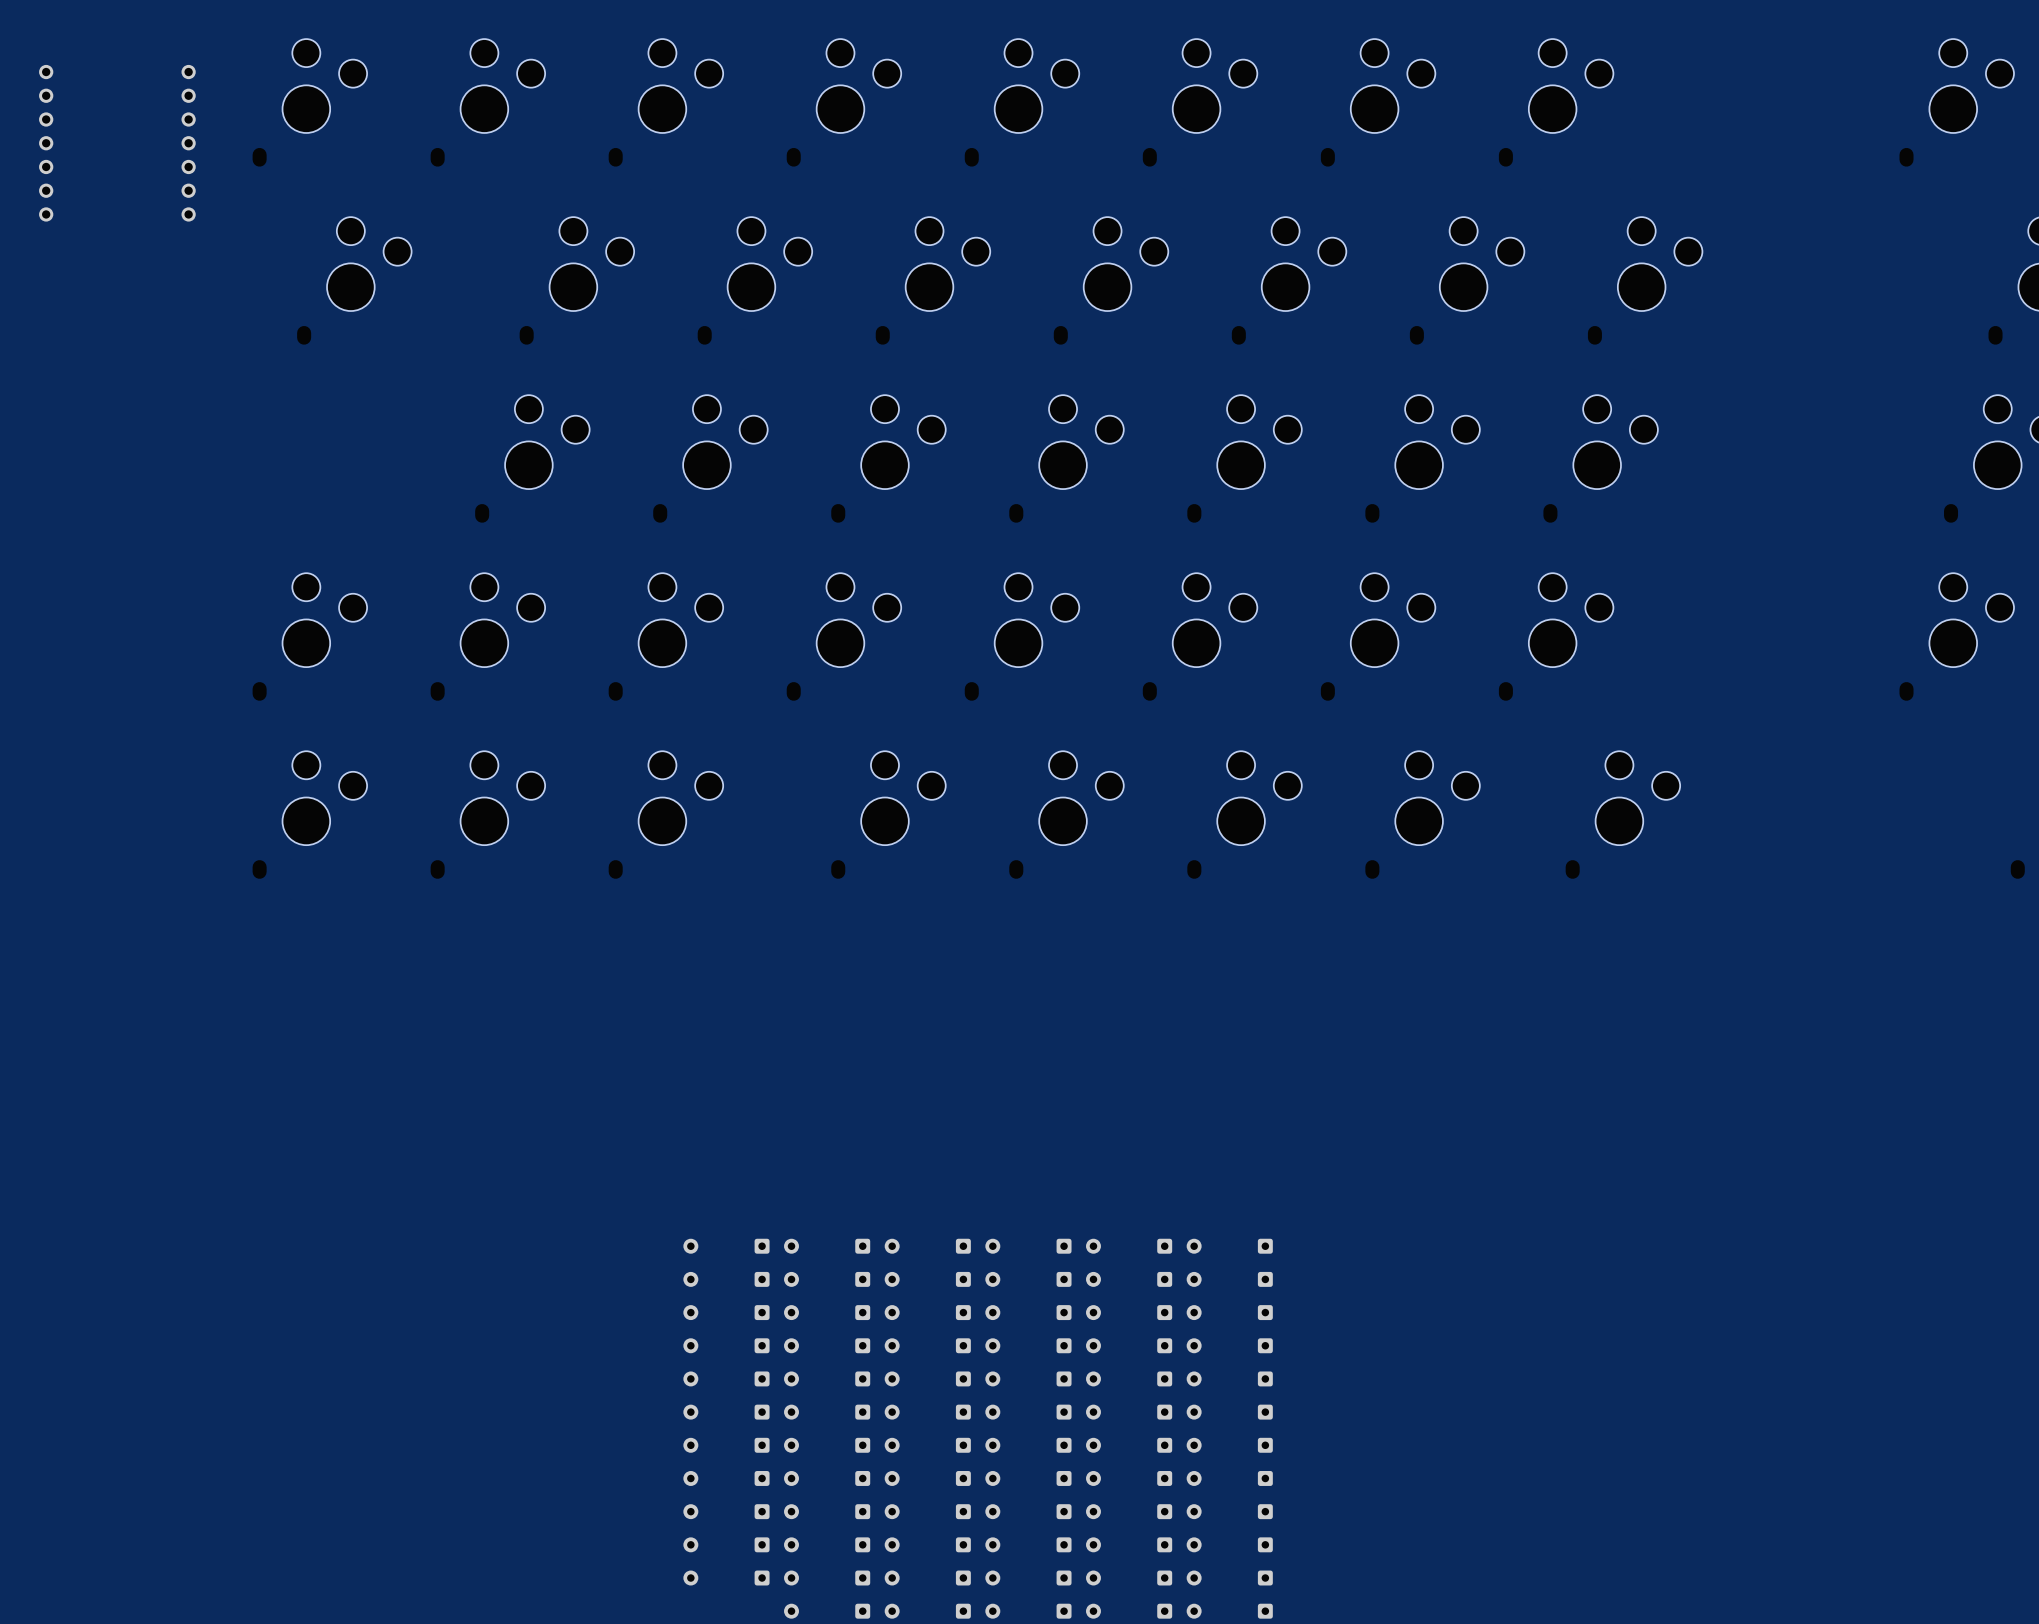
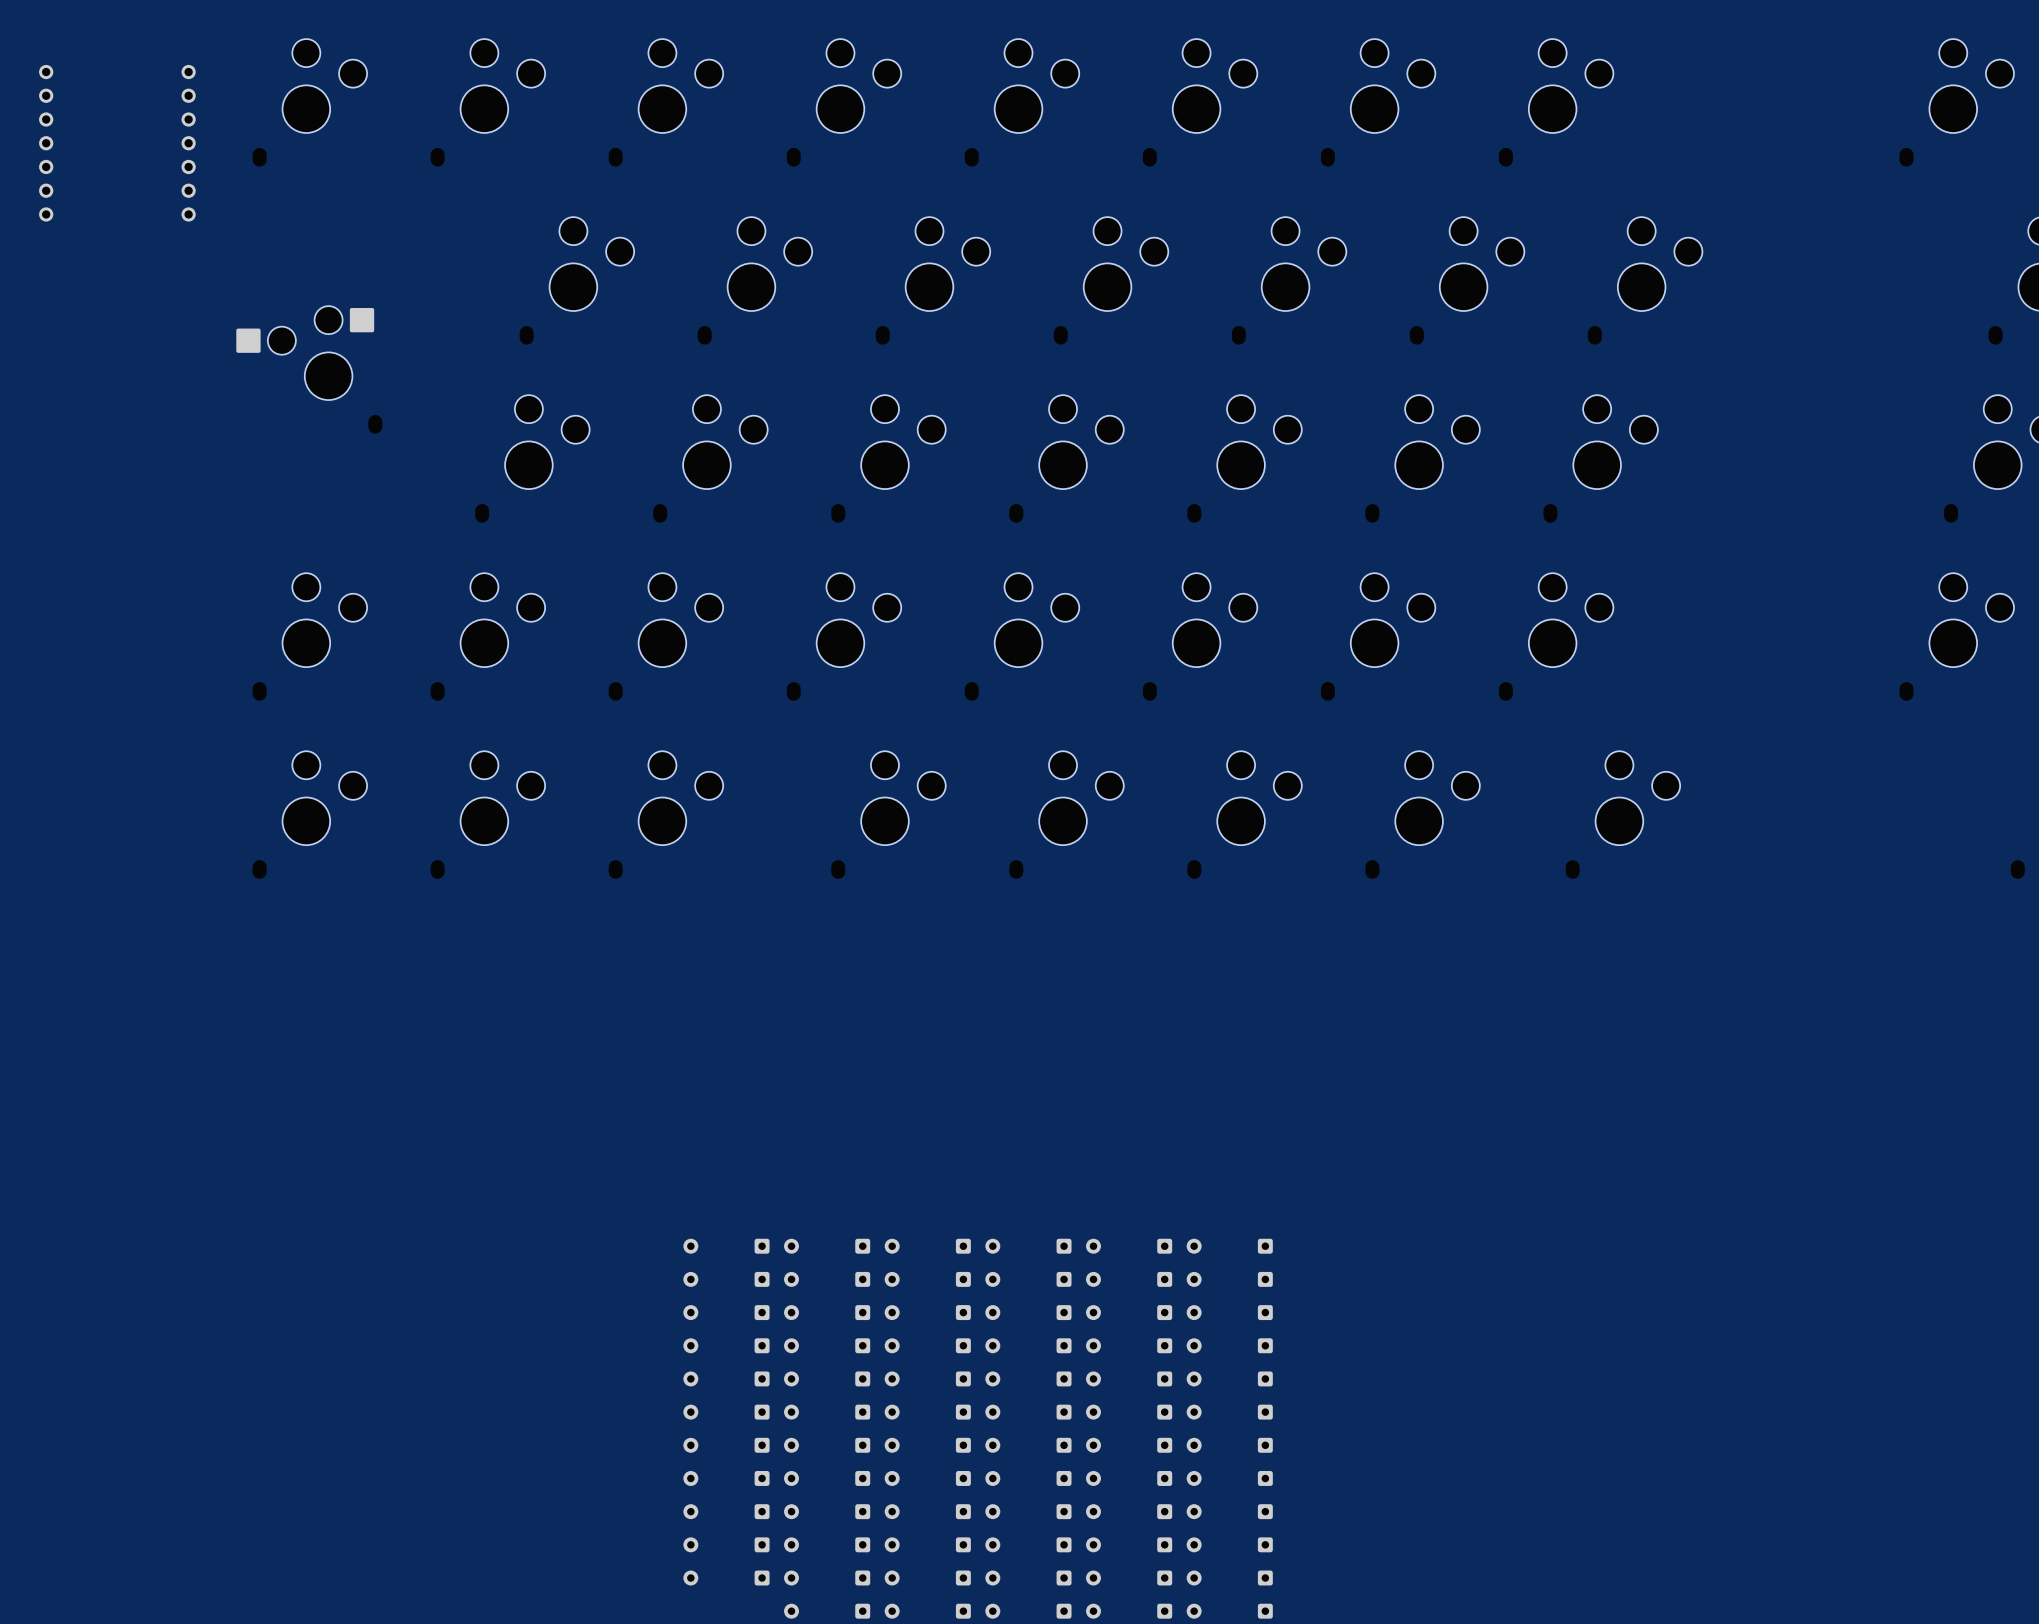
part: (354, 280) -> none
part: none -> (309, 369)

